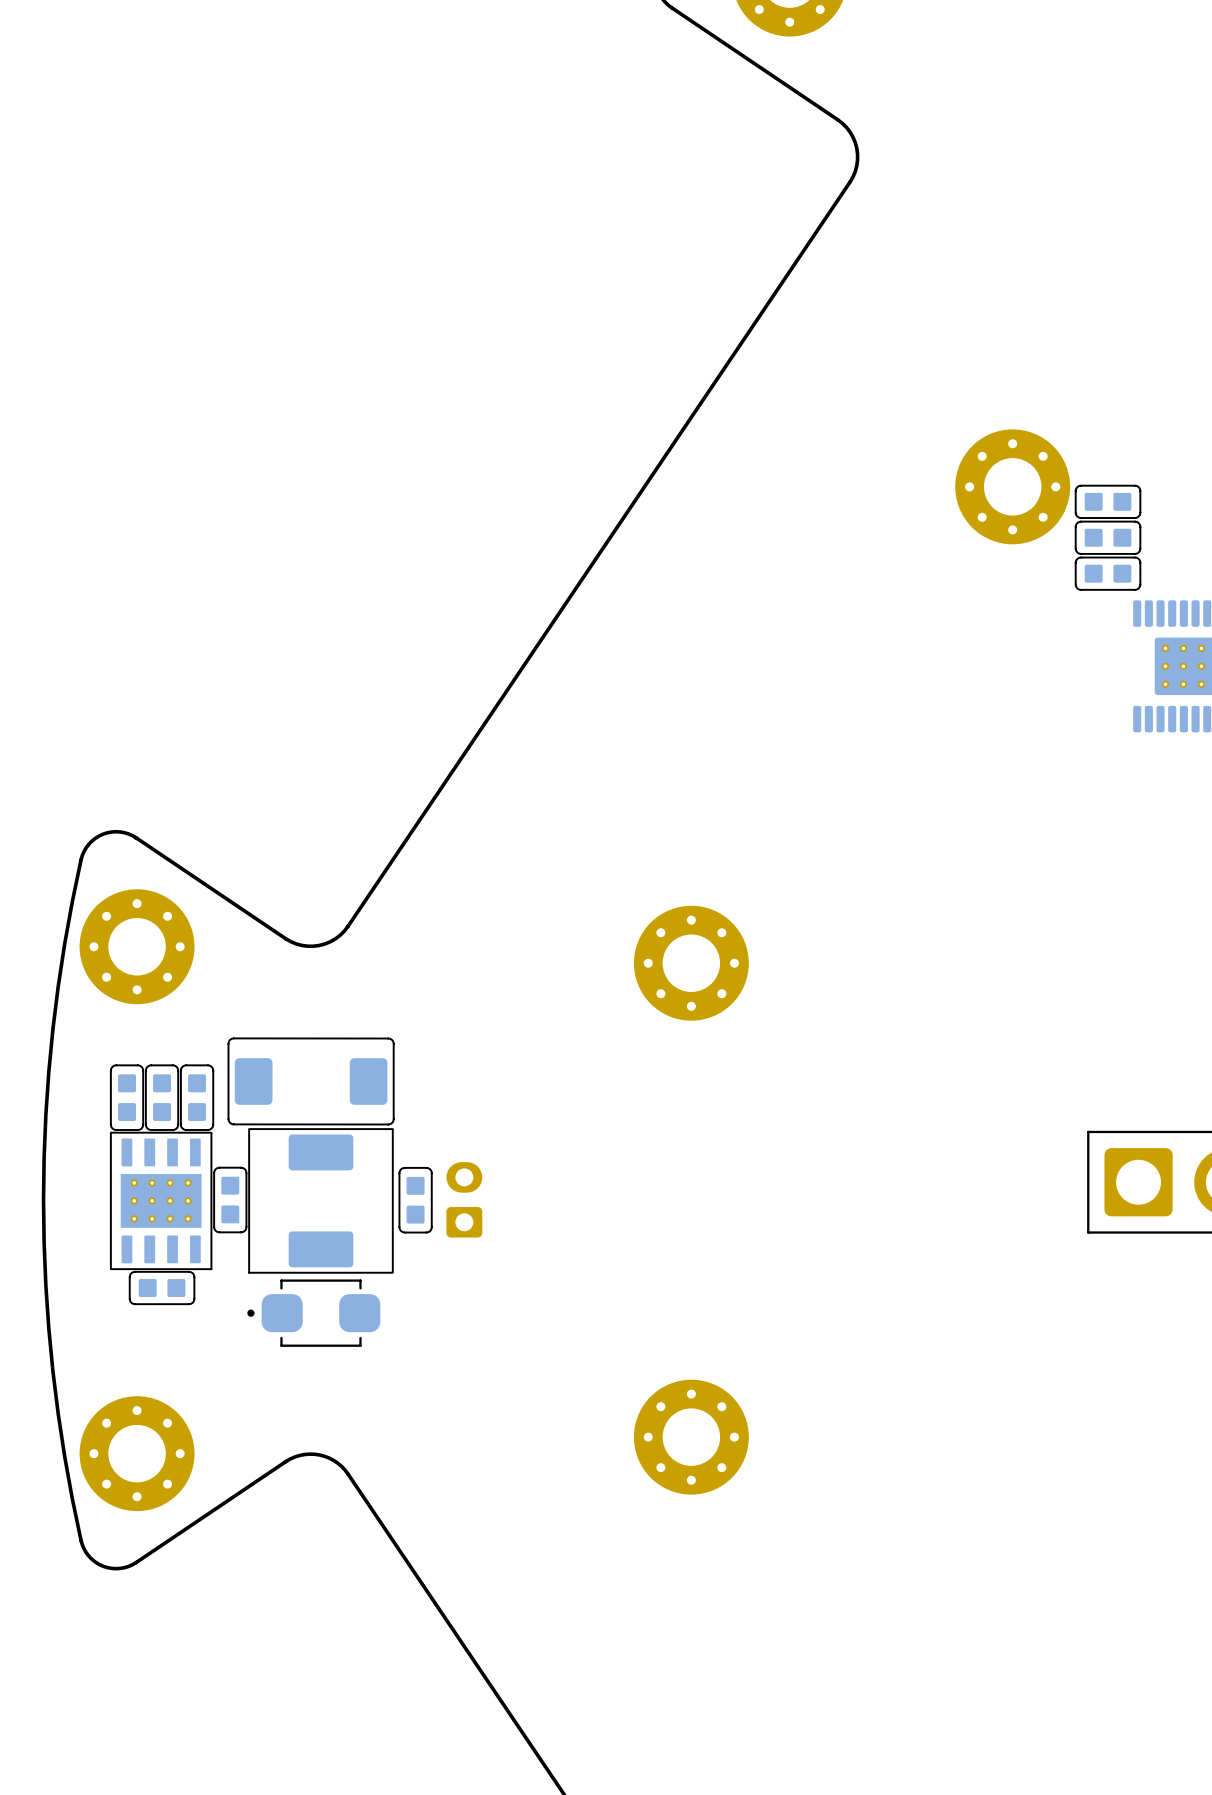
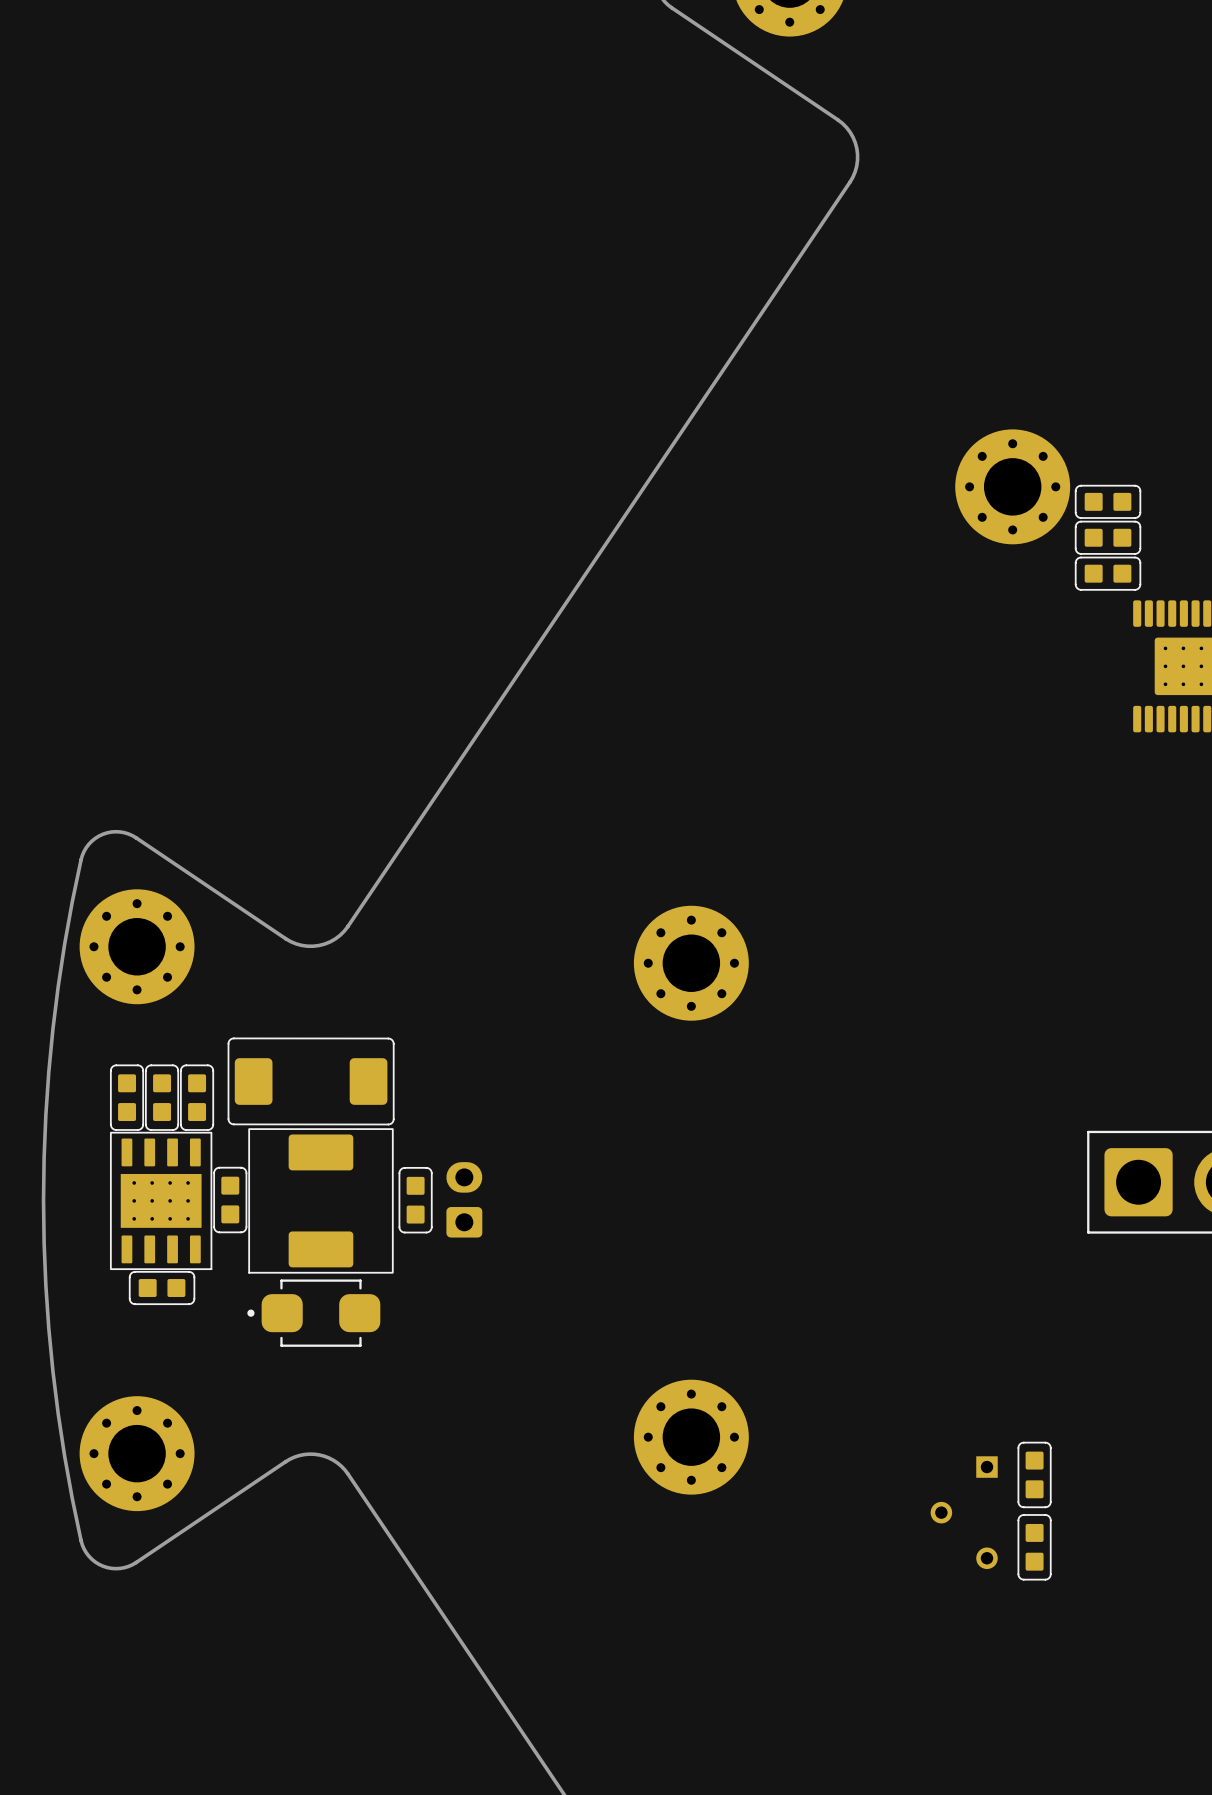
part: none -> (1034, 1474)
part: none -> (964, 1512)
part: none -> (1034, 1547)

